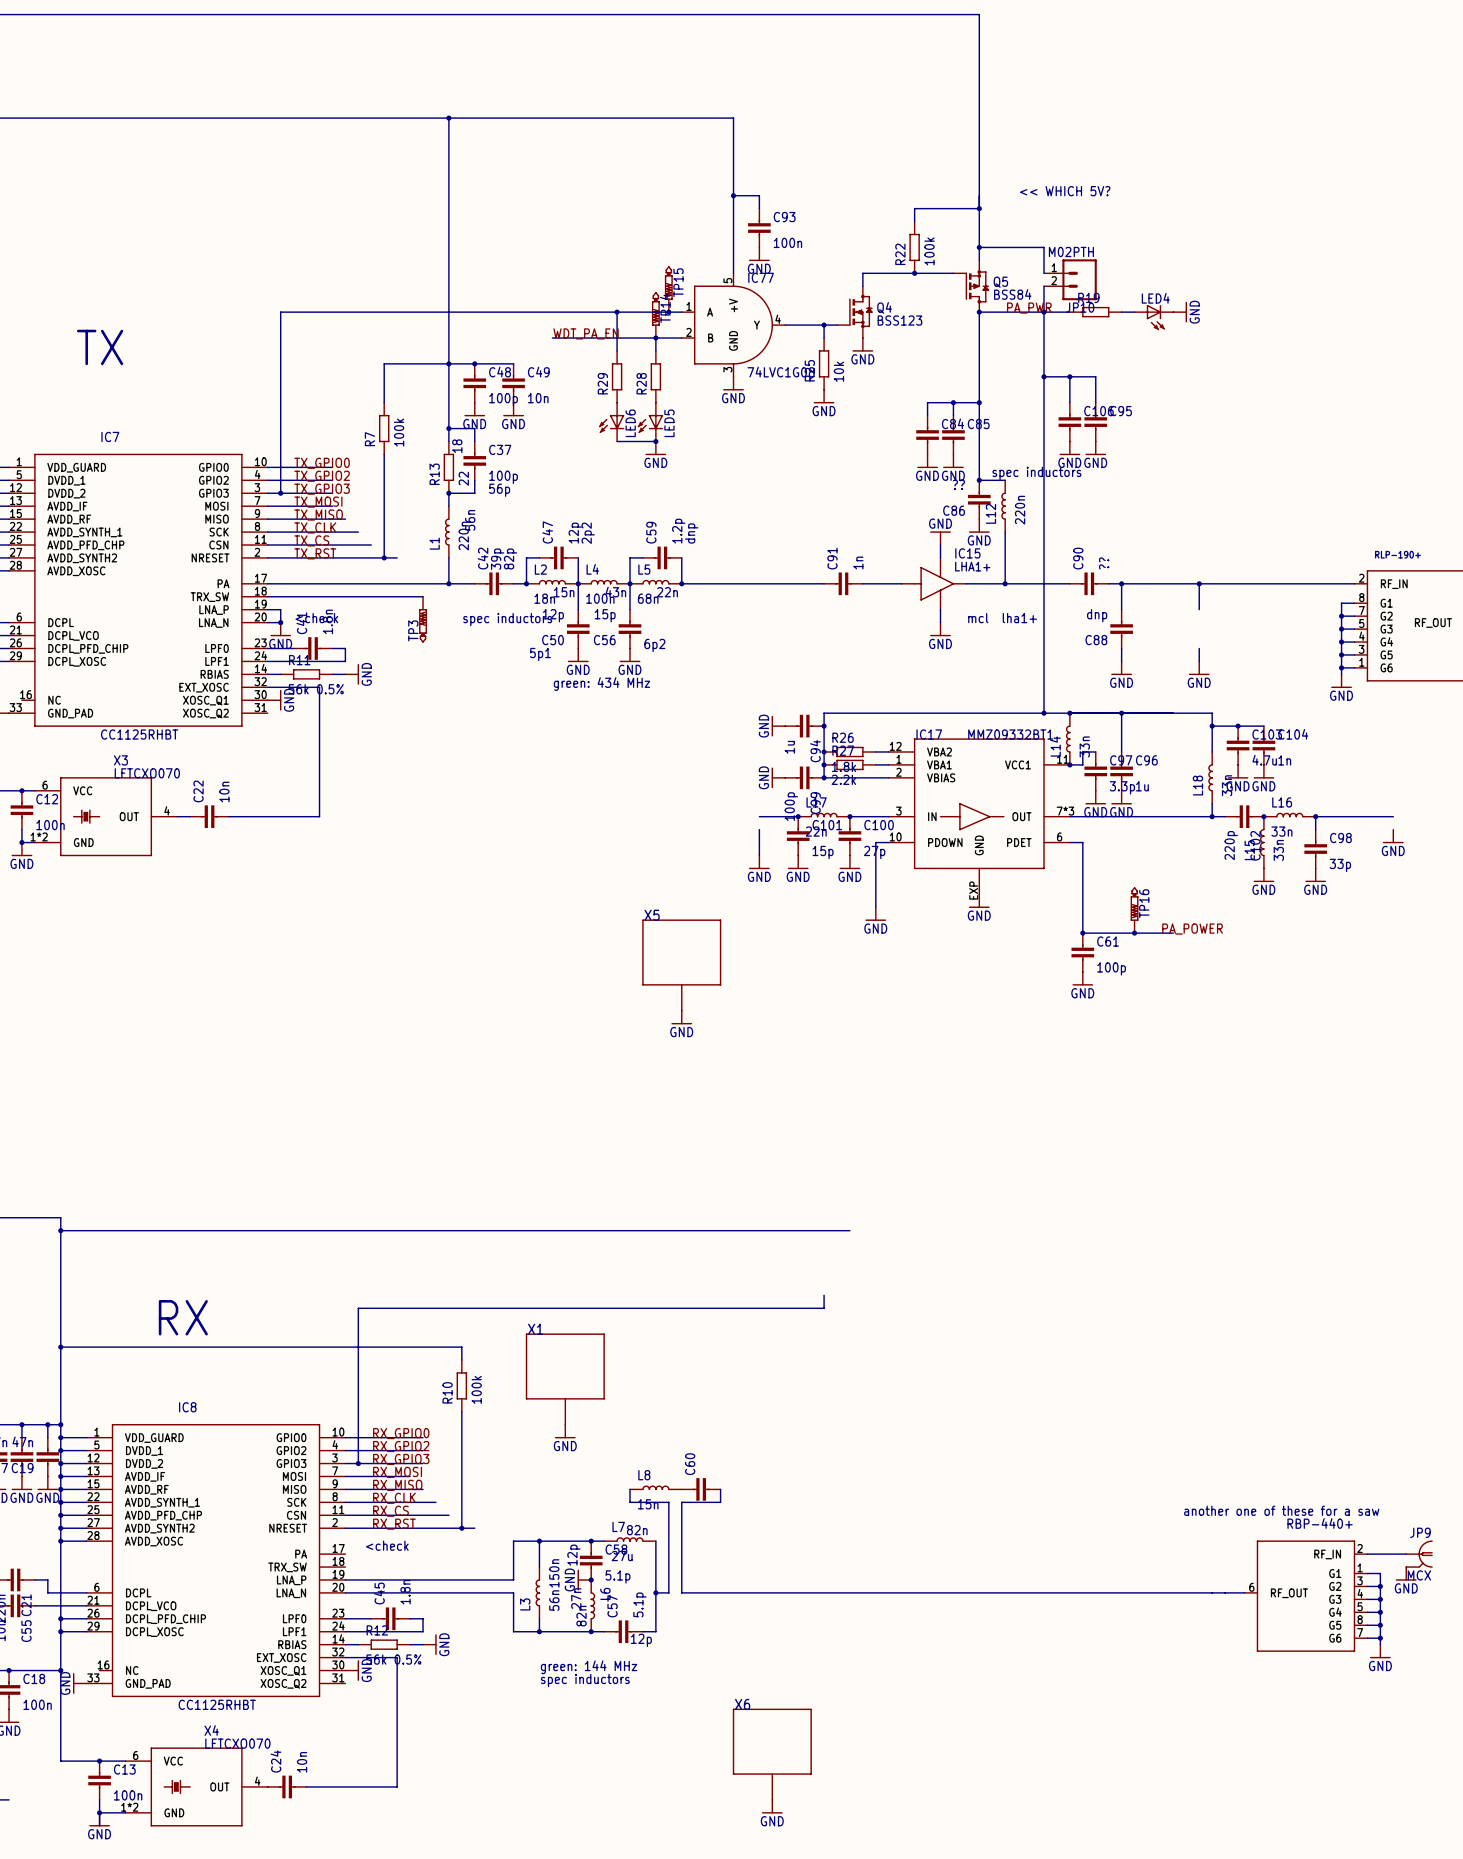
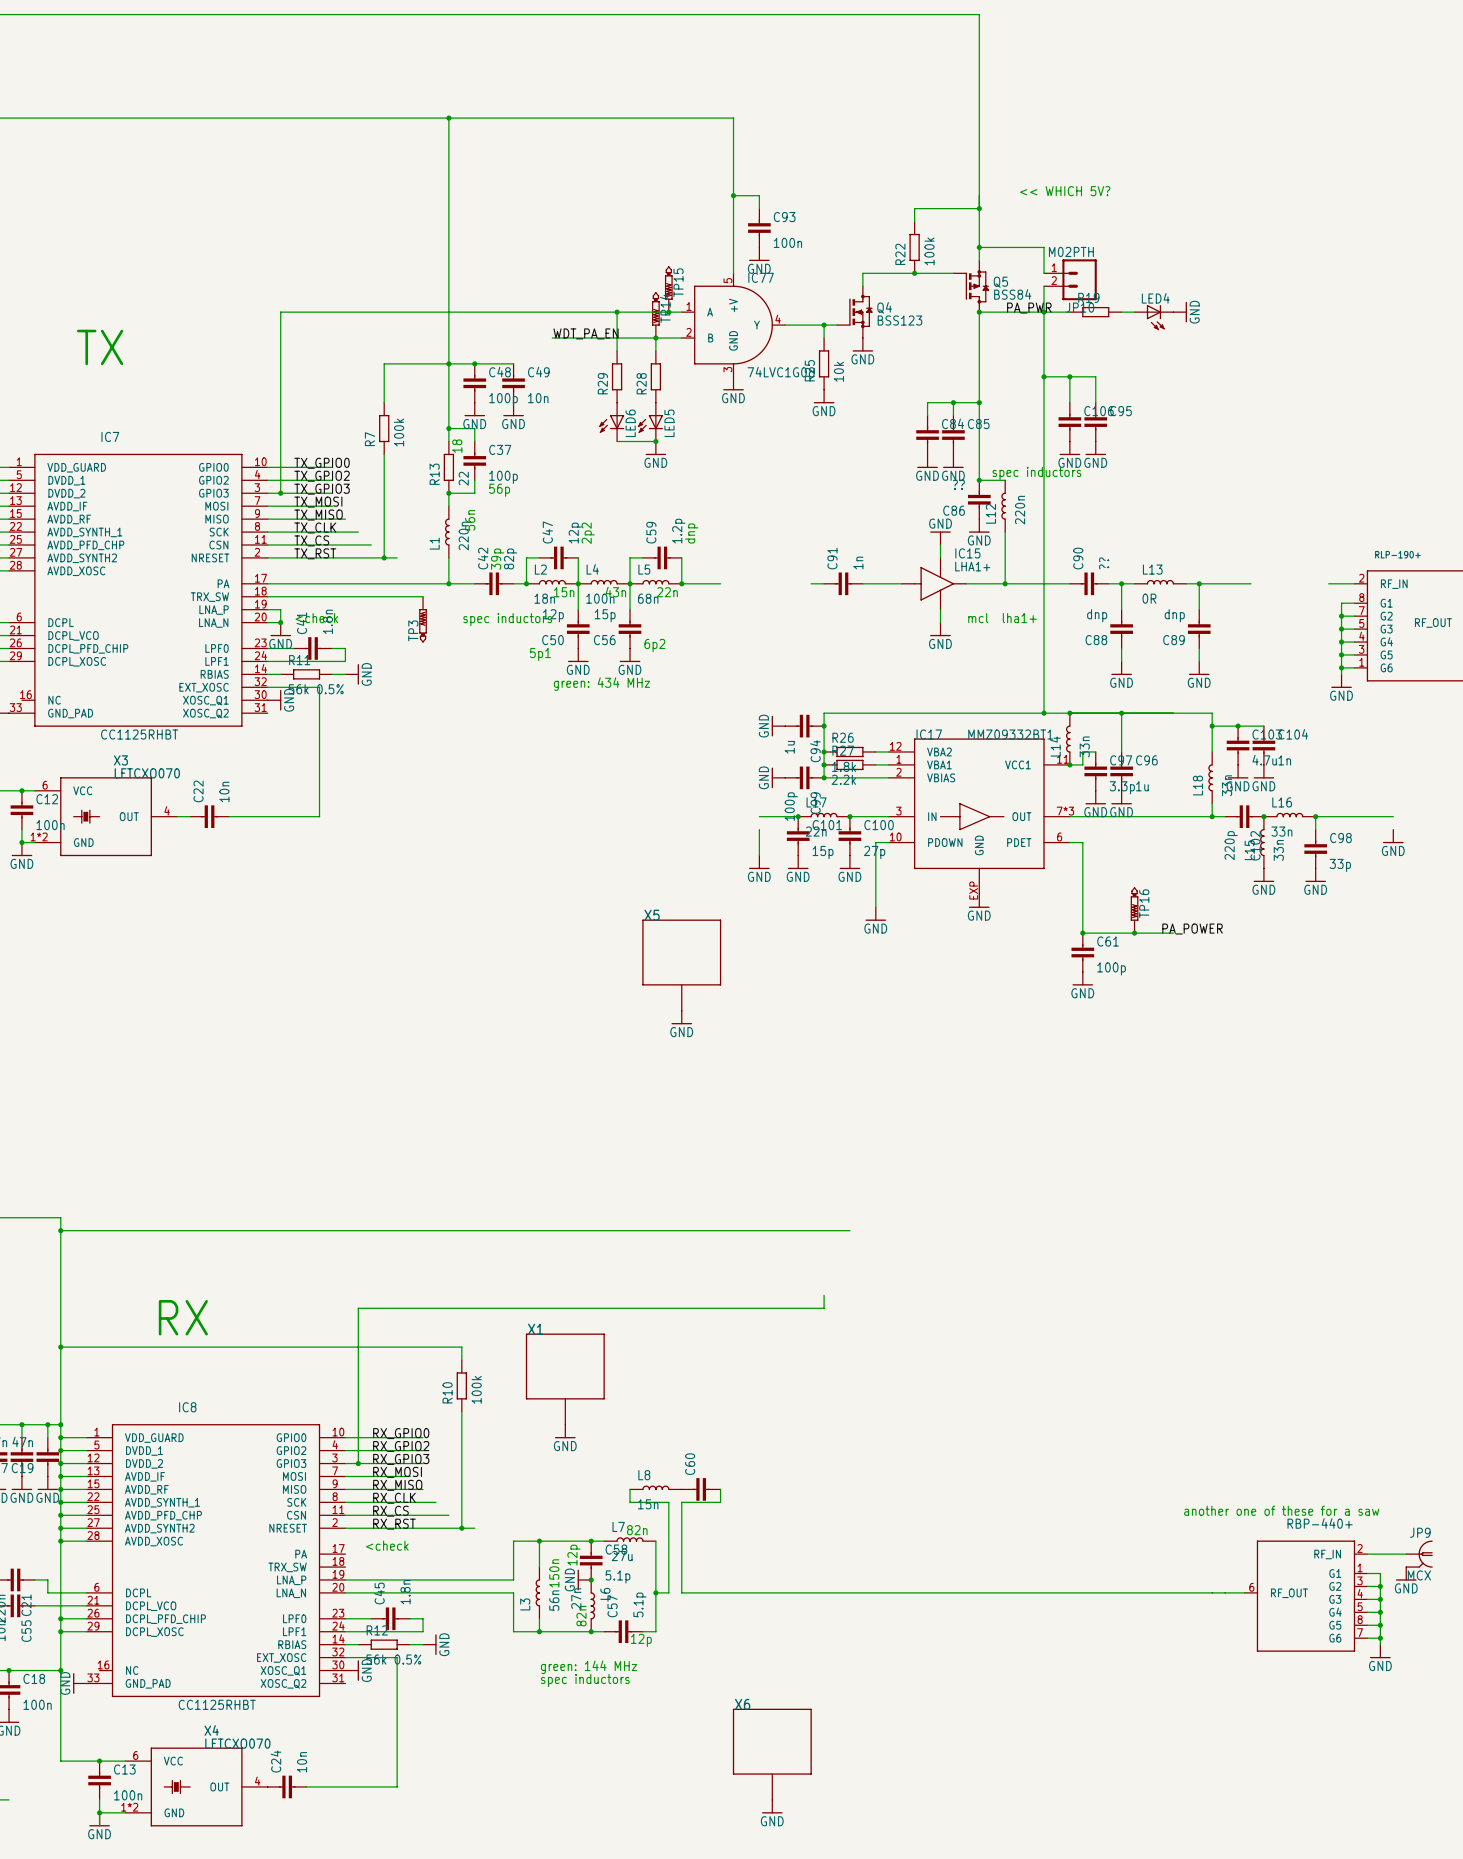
L13: none -> 0R (1160, 582)
wire: (720, 583) (811, 583) -> none
wire: (1250, 583) (1328, 583) -> none
C89: none -> dnp (1199, 629)

